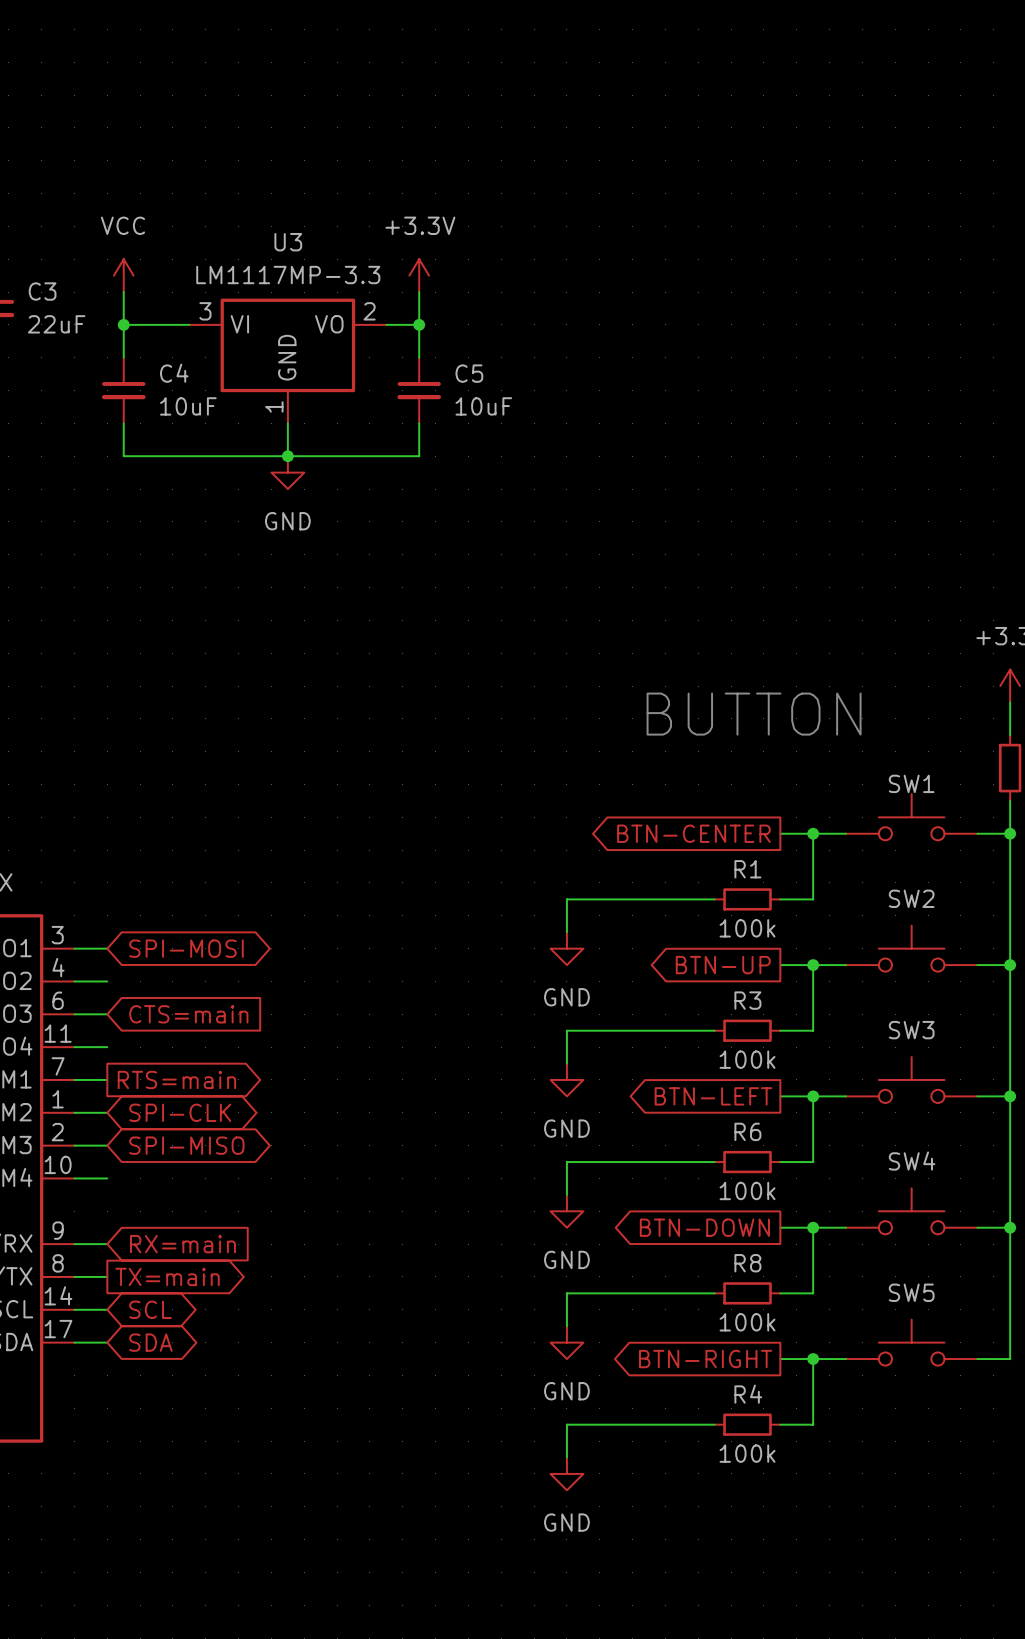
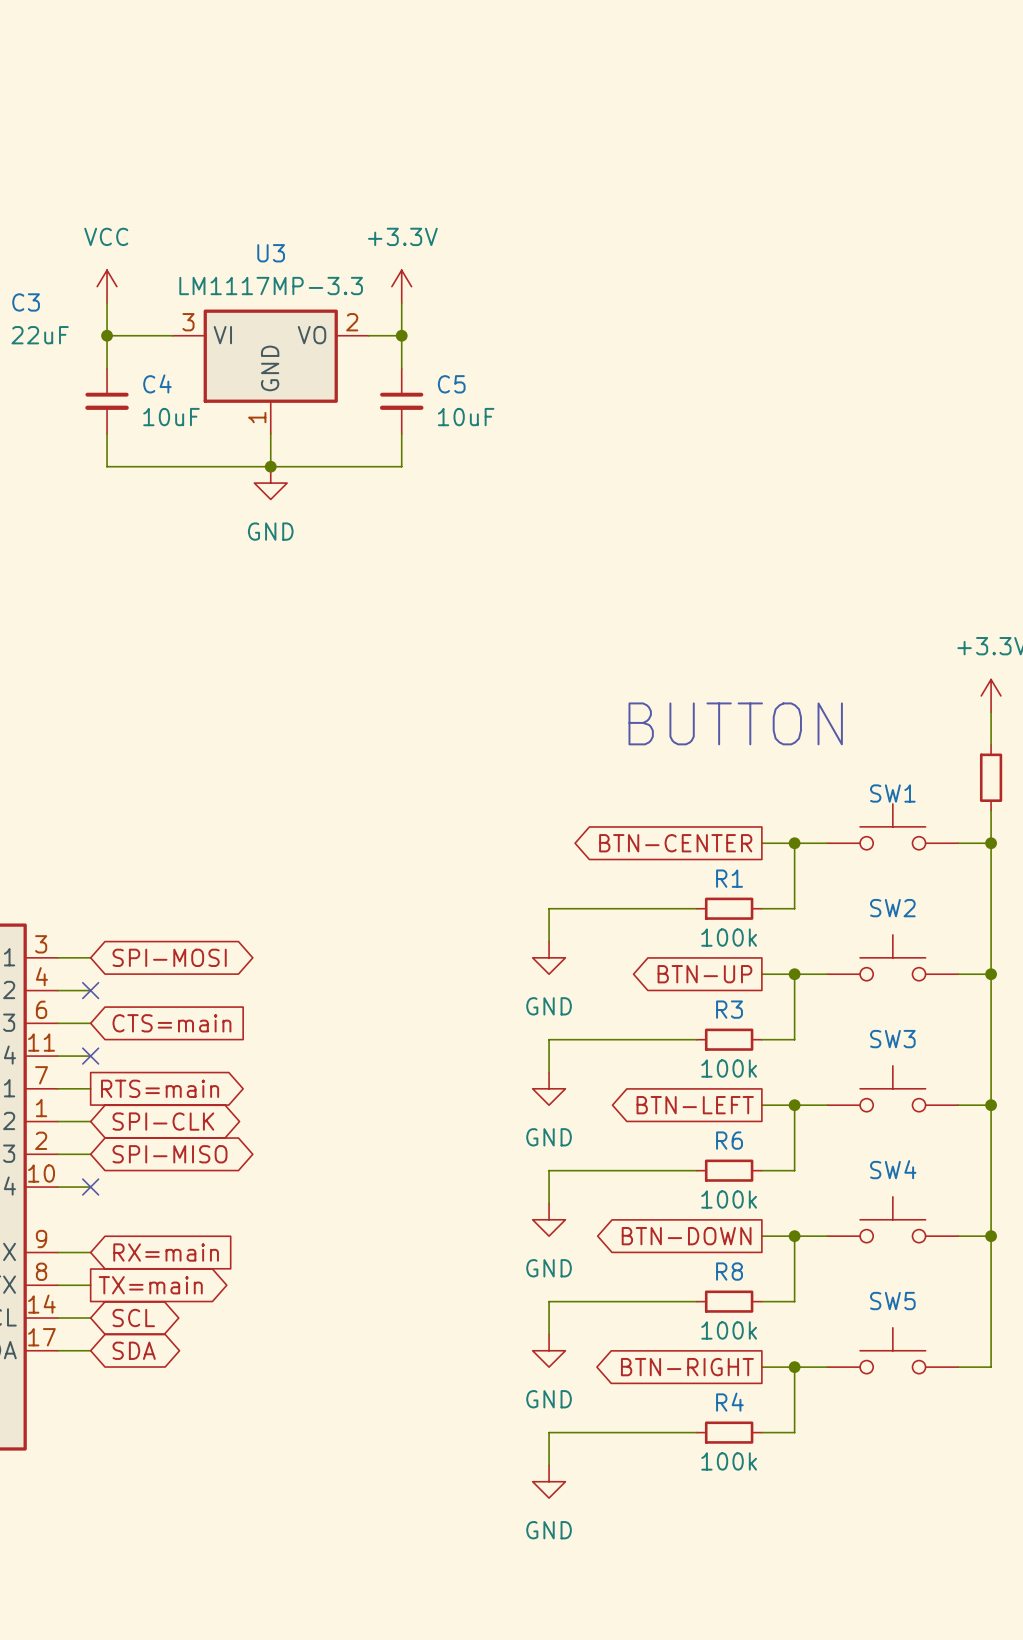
no-connect mark: none -> (90, 990)
no-connect mark: none -> (90, 1056)
no-connect mark: none -> (90, 1187)

